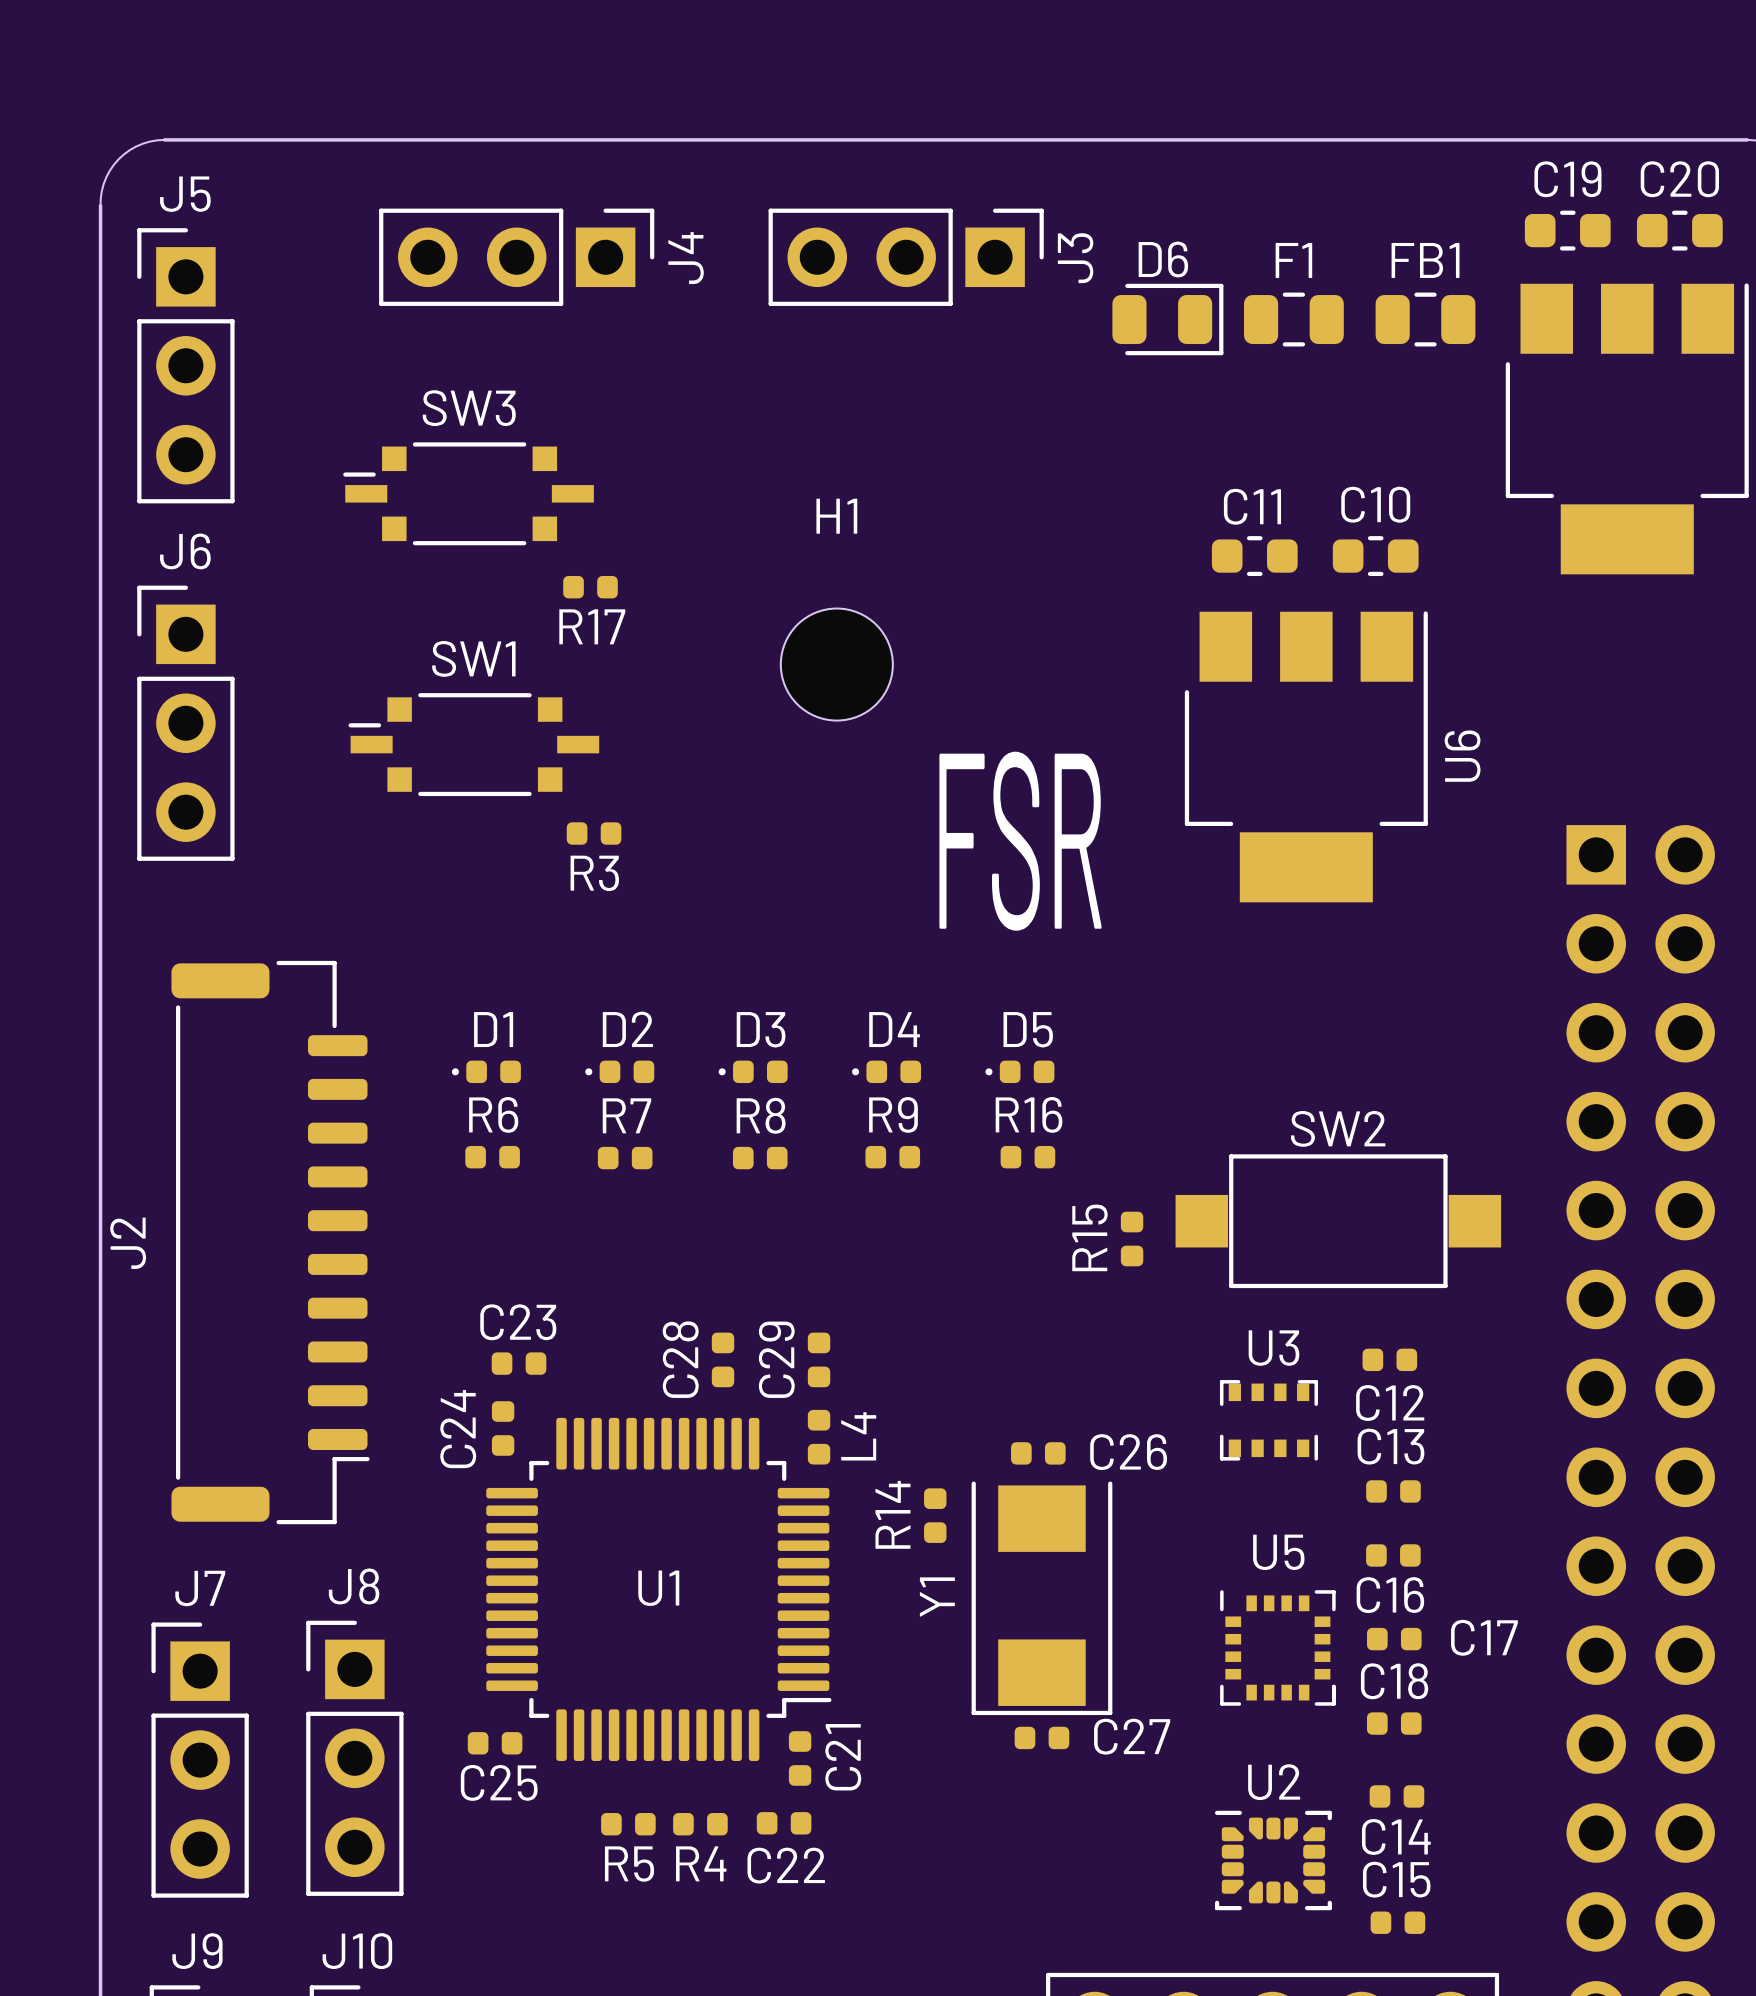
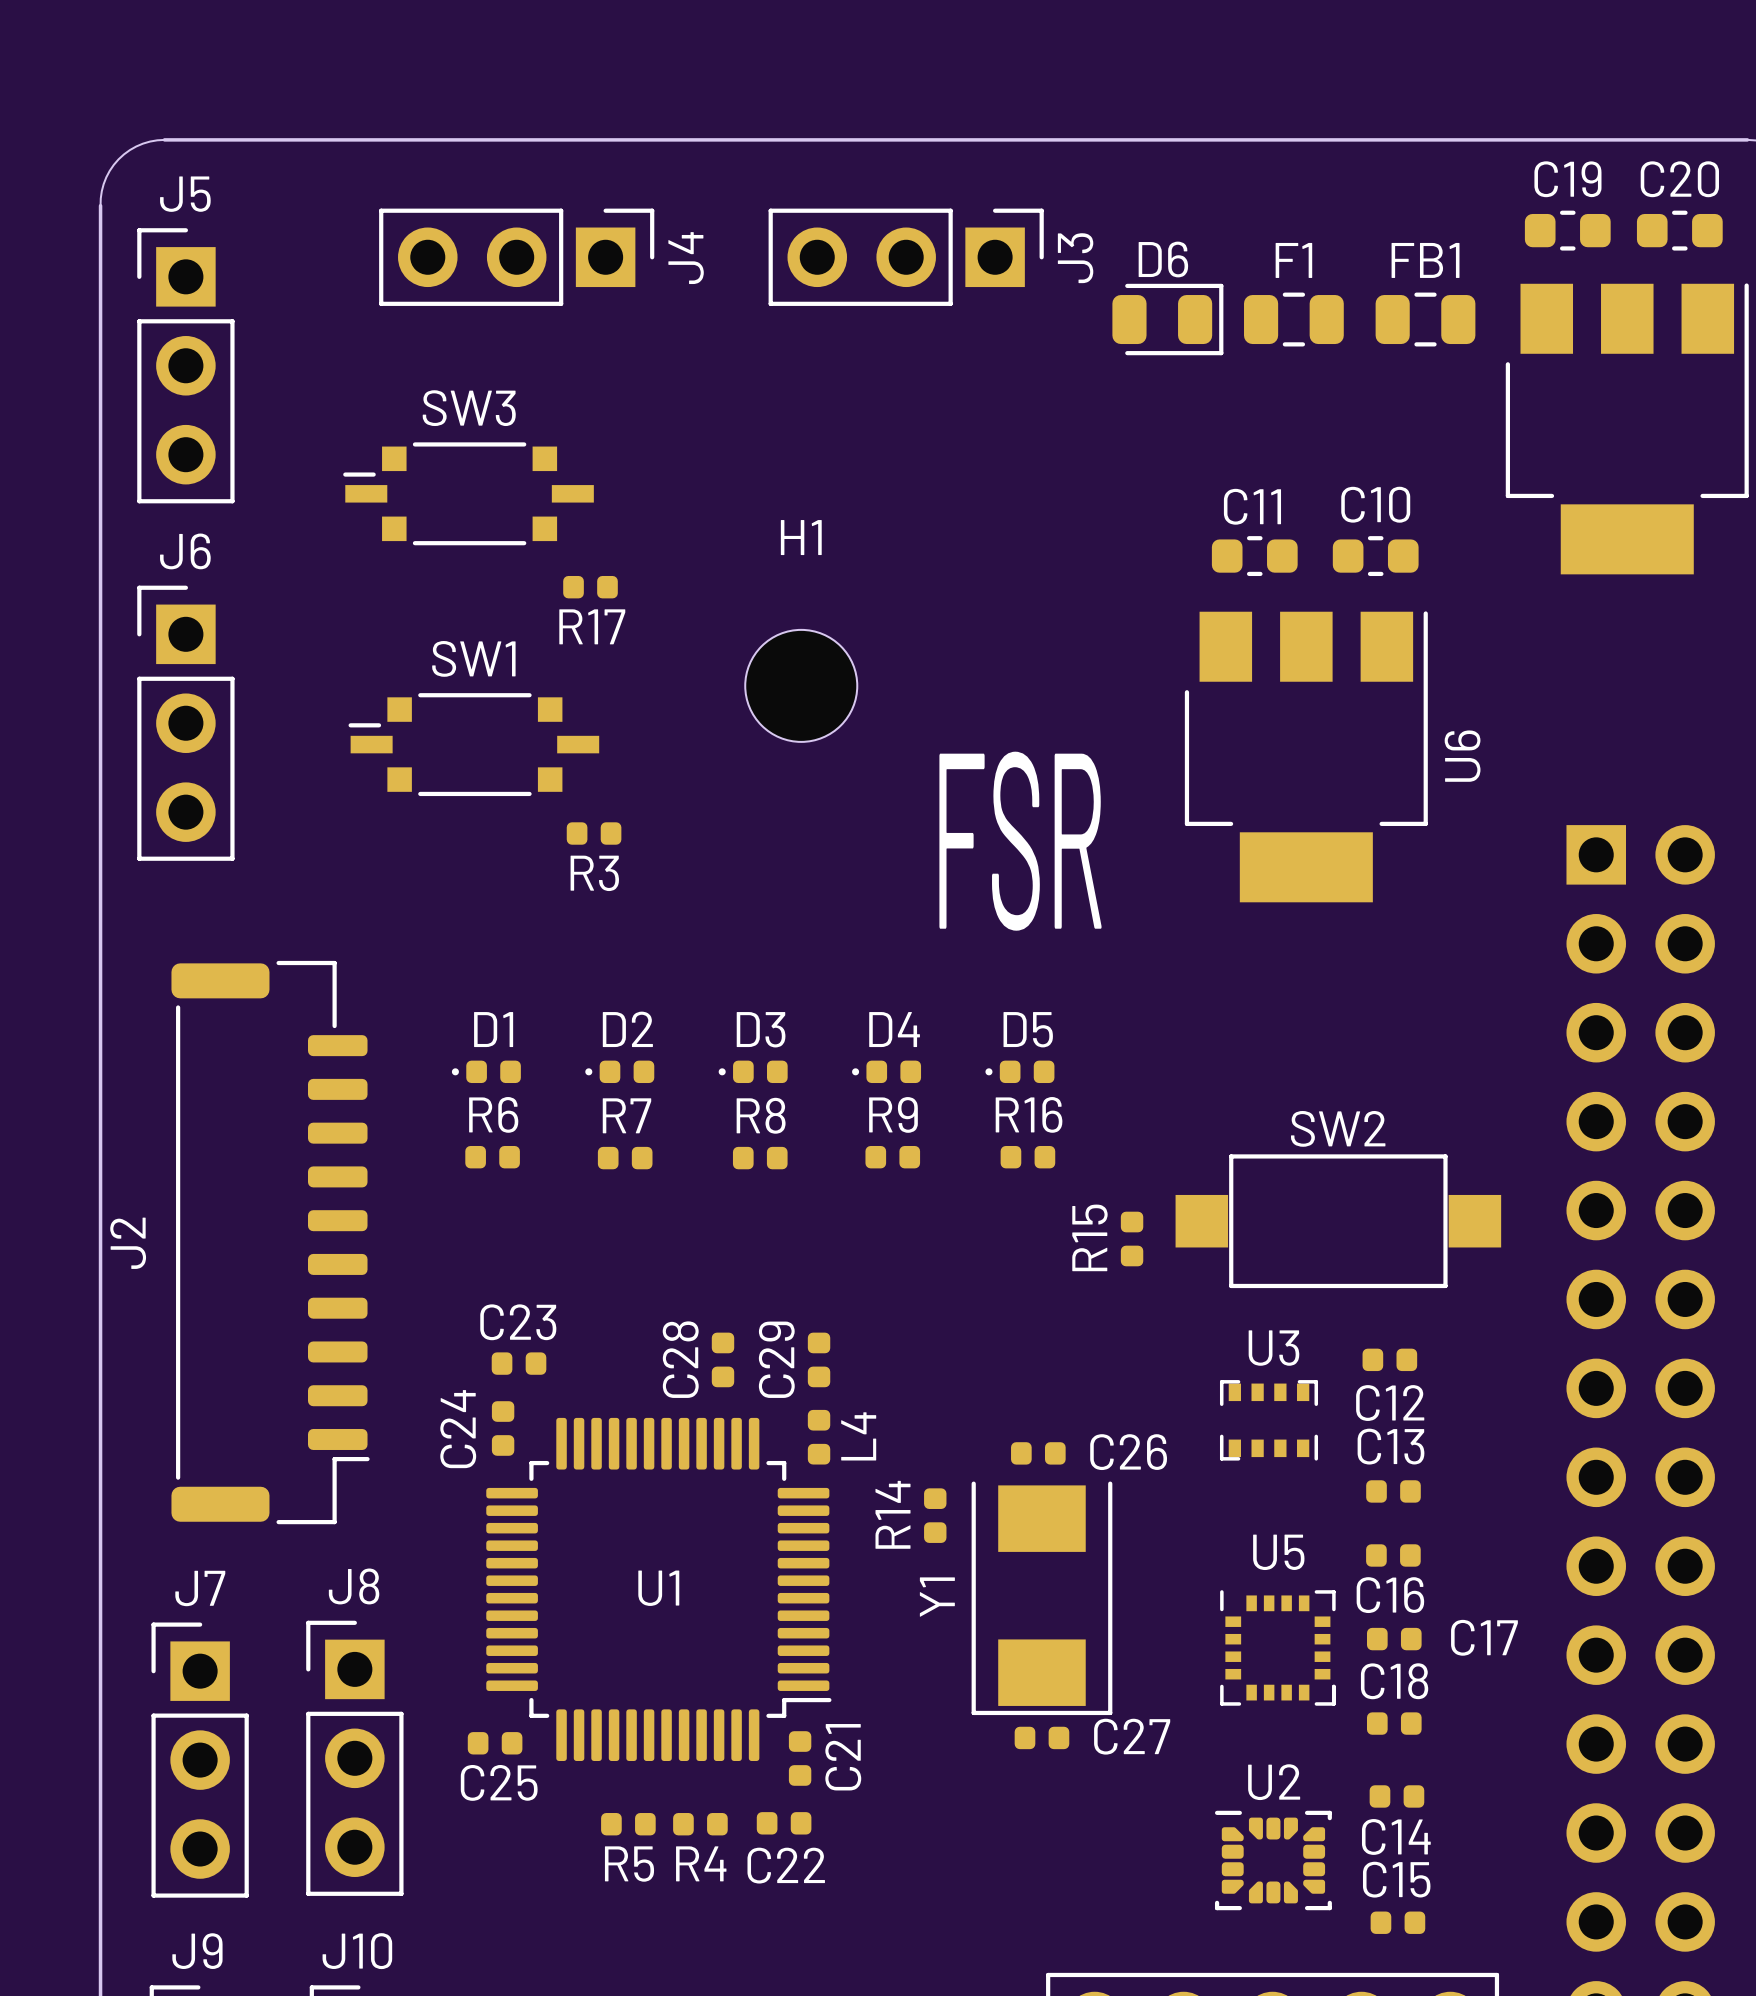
H1 position: (836, 664) -> (801, 685)

